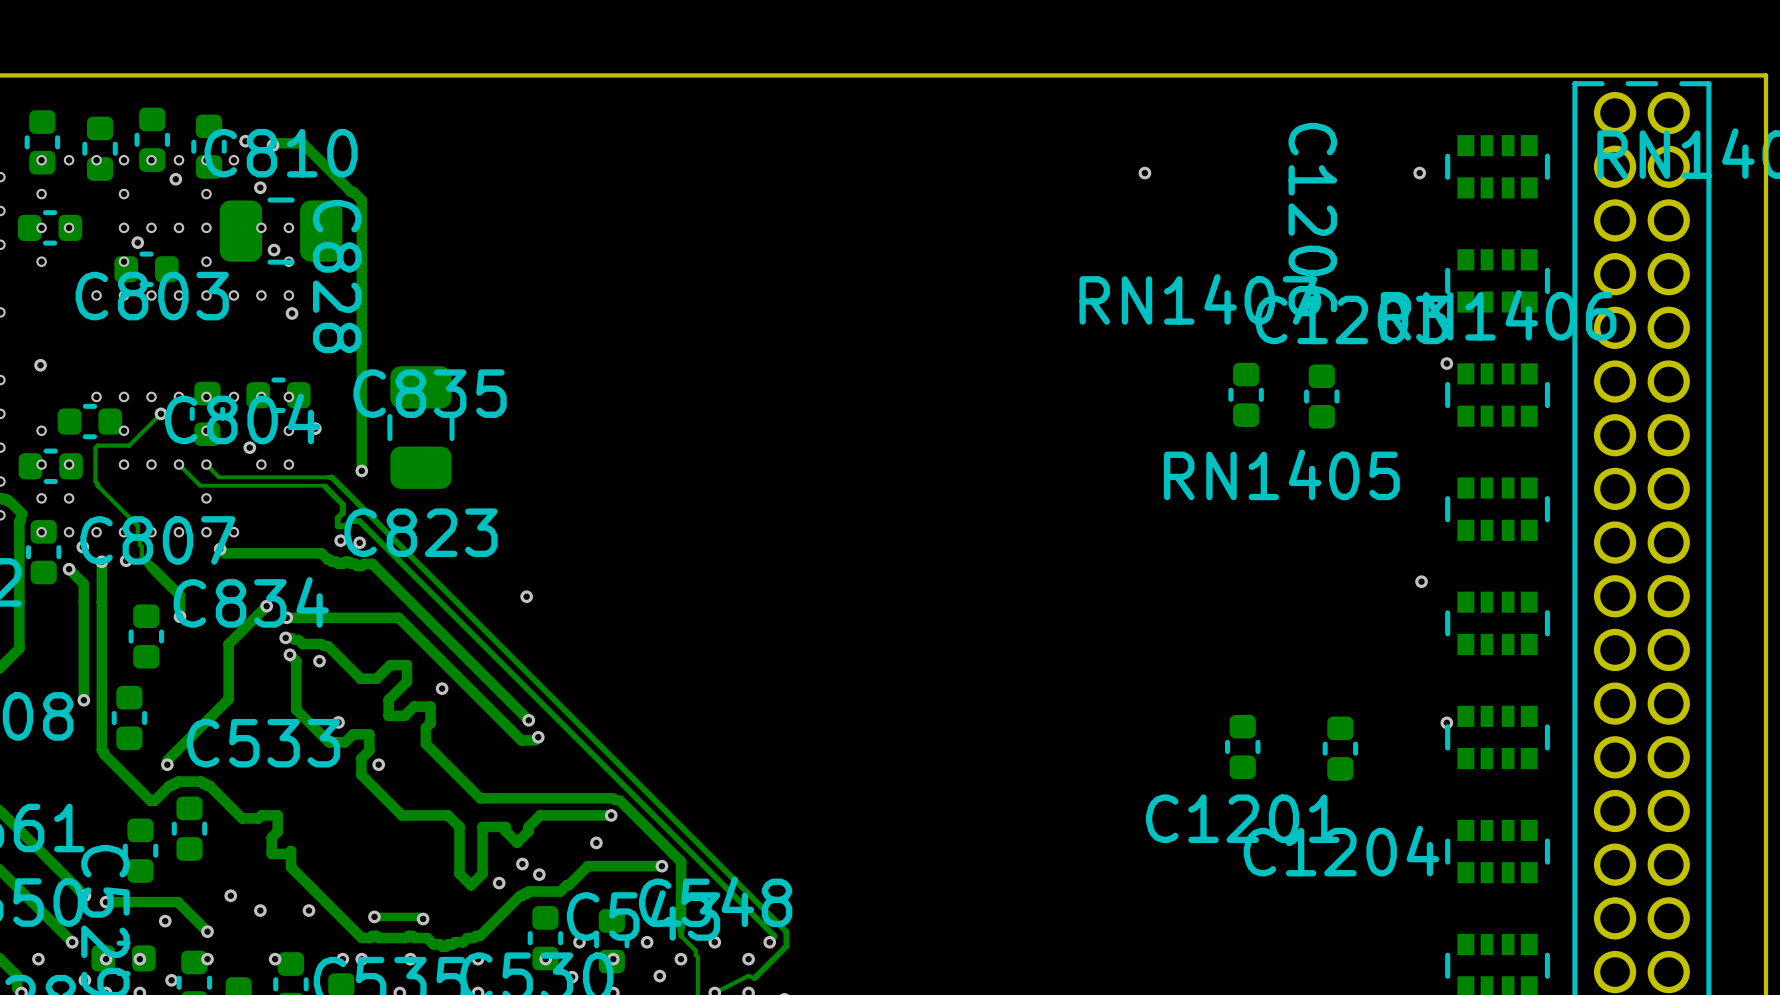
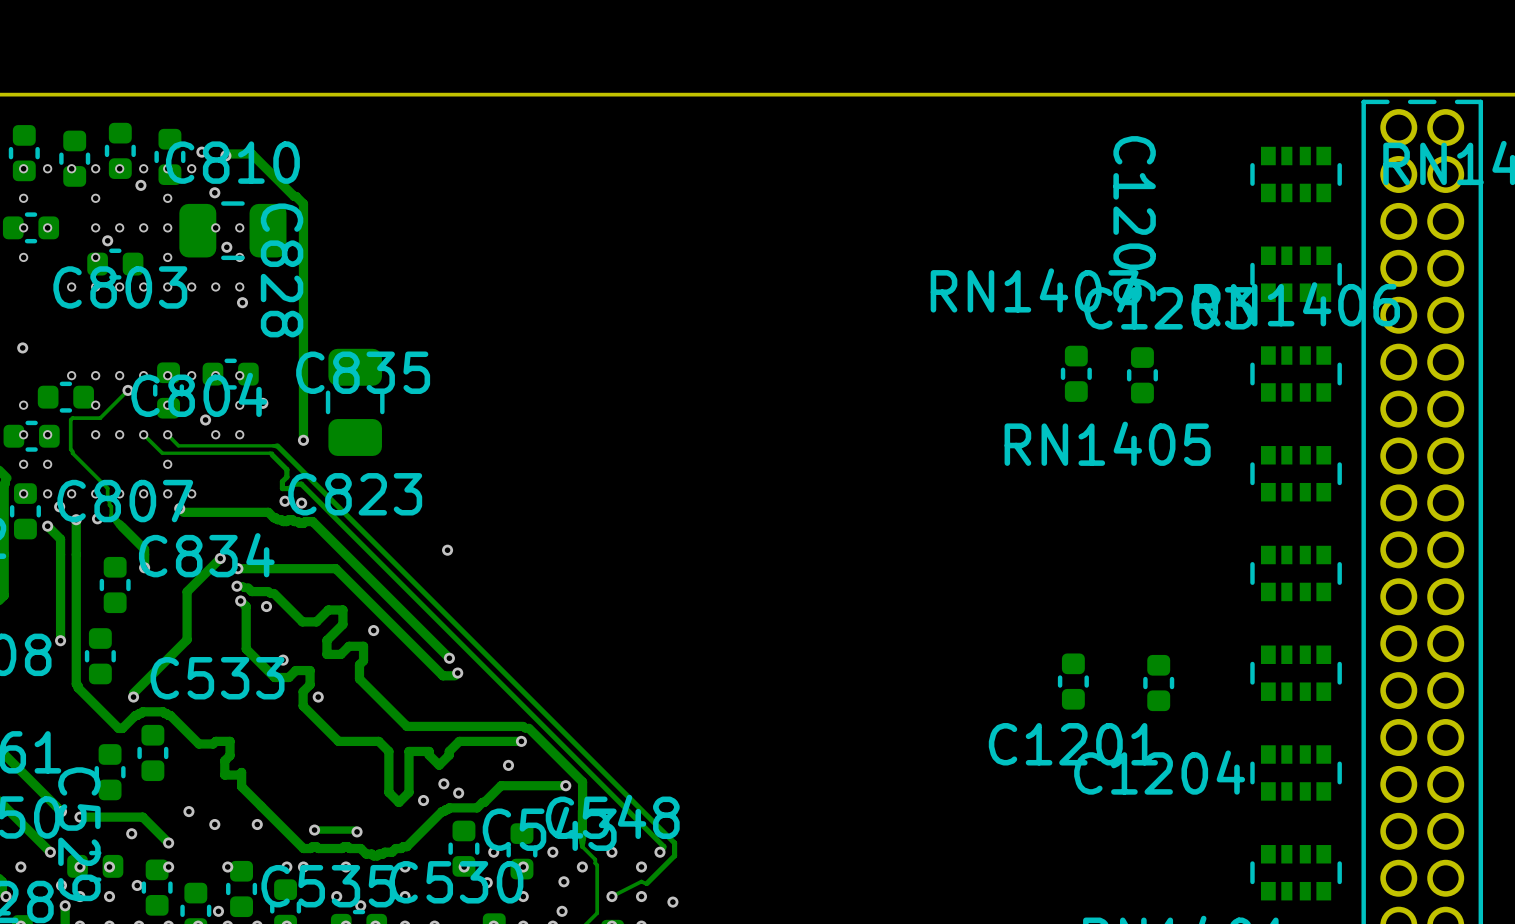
via: (1144, 173) -> none
via: (1419, 173) -> none
via: (1446, 363) -> none
via: (1421, 581) -> none
via: (1446, 722) -> none

